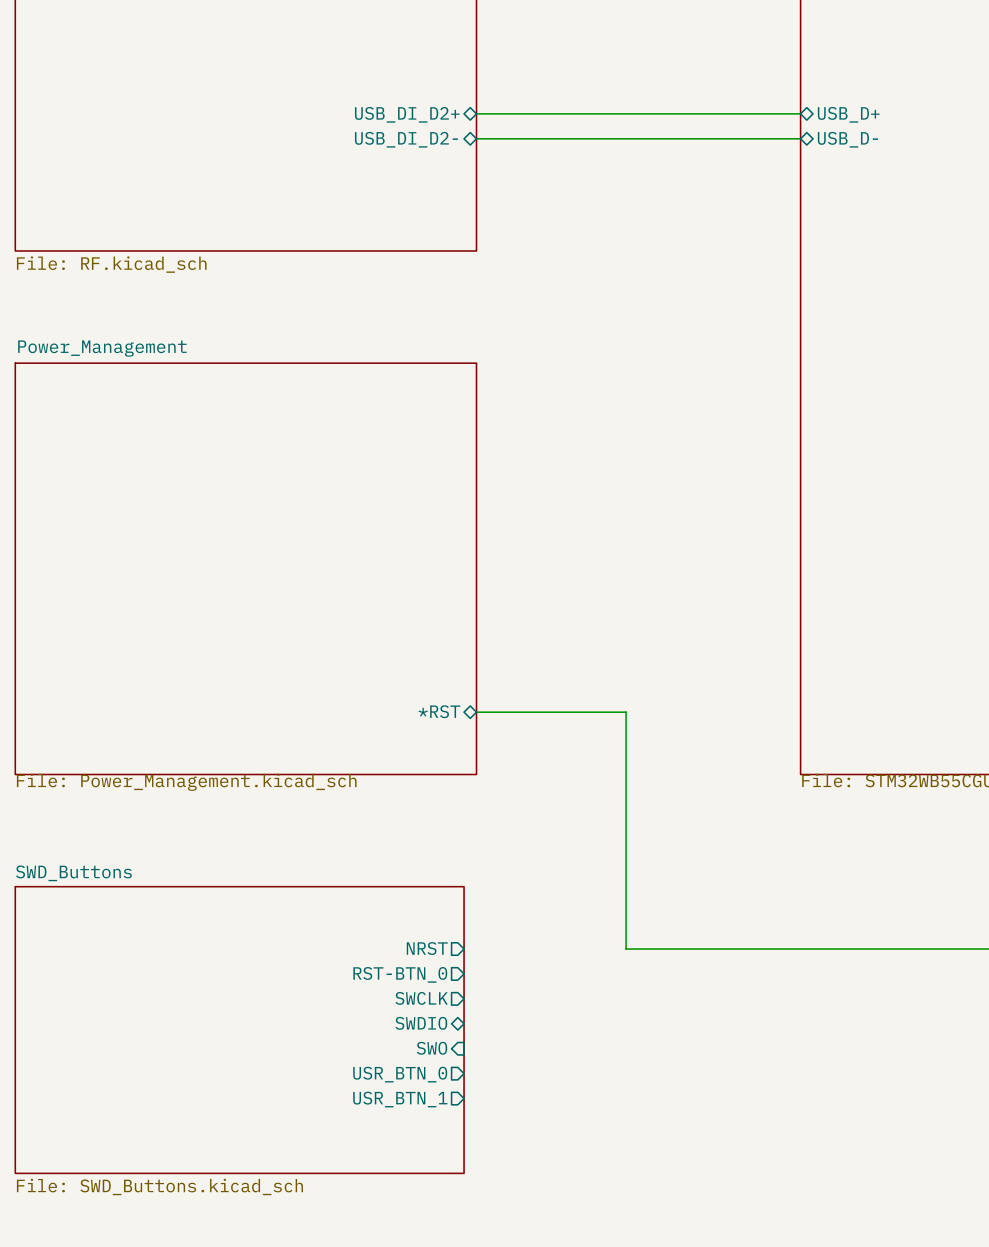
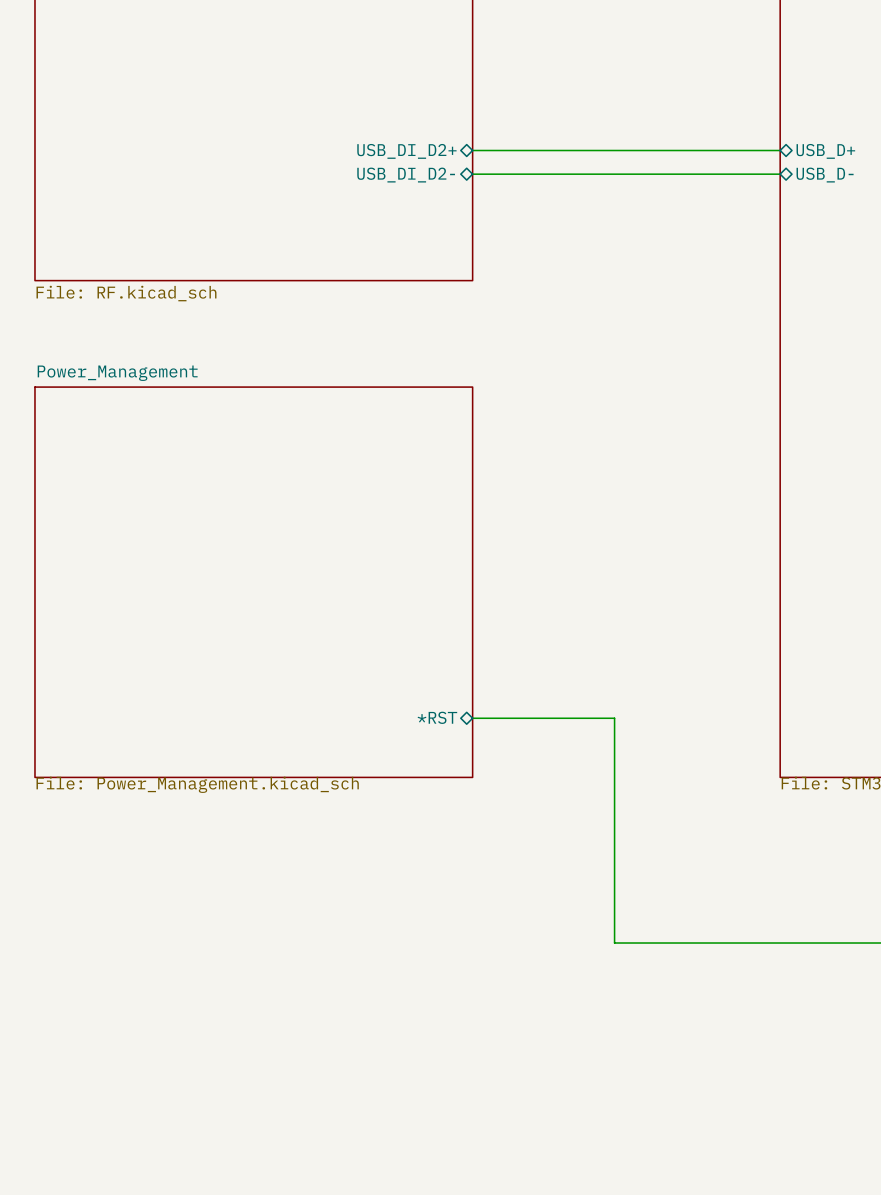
sheet pin: NRST (427, 948) -> none
sheet pin: RST-BTN_0 (400, 974) -> none
sheet pin: SWCLK (421, 998) -> none
sheet pin: SWDIO (421, 1023) -> none
sheet SWD_Buttons: File: SWD_Buttons.kicad_sch (239, 1030) -> none
sheet pin: SWO (432, 1048) -> none
sheet pin: USR_BTN_0 (400, 1074) -> none
sheet pin: USR_BTN_1 (400, 1099) -> none

